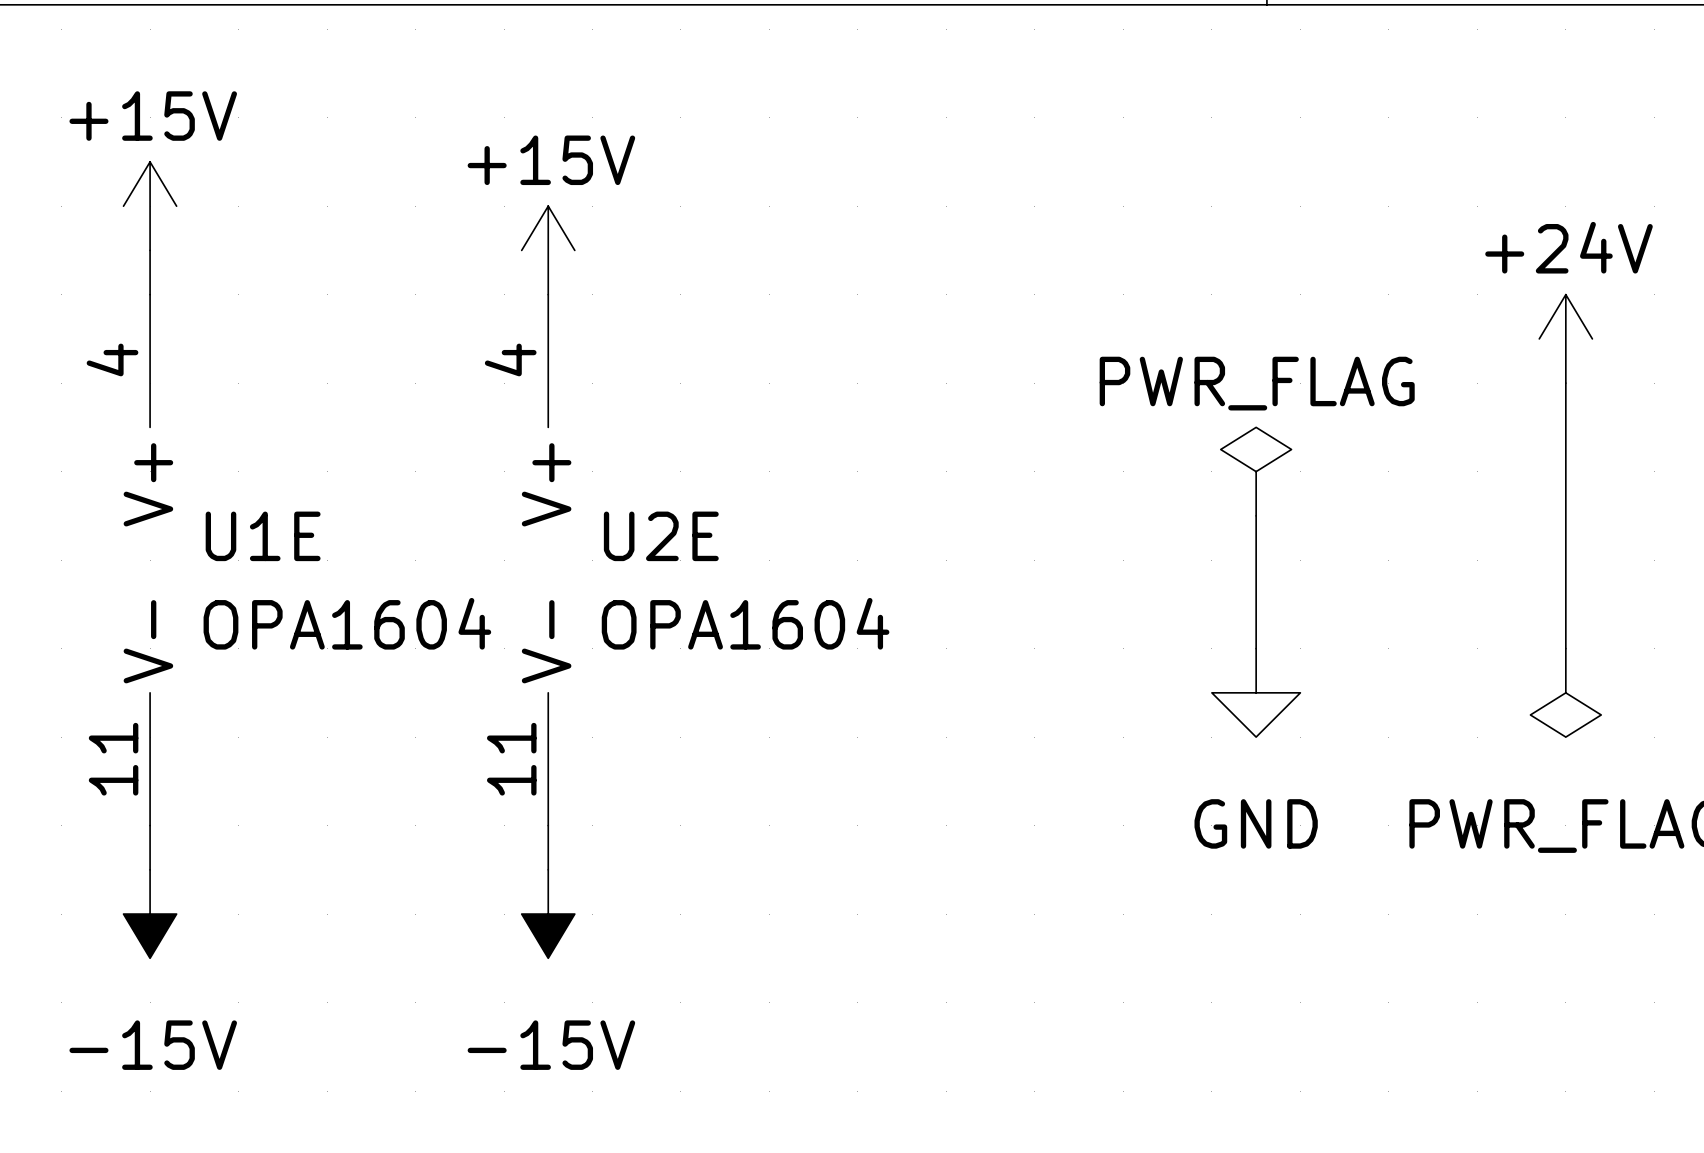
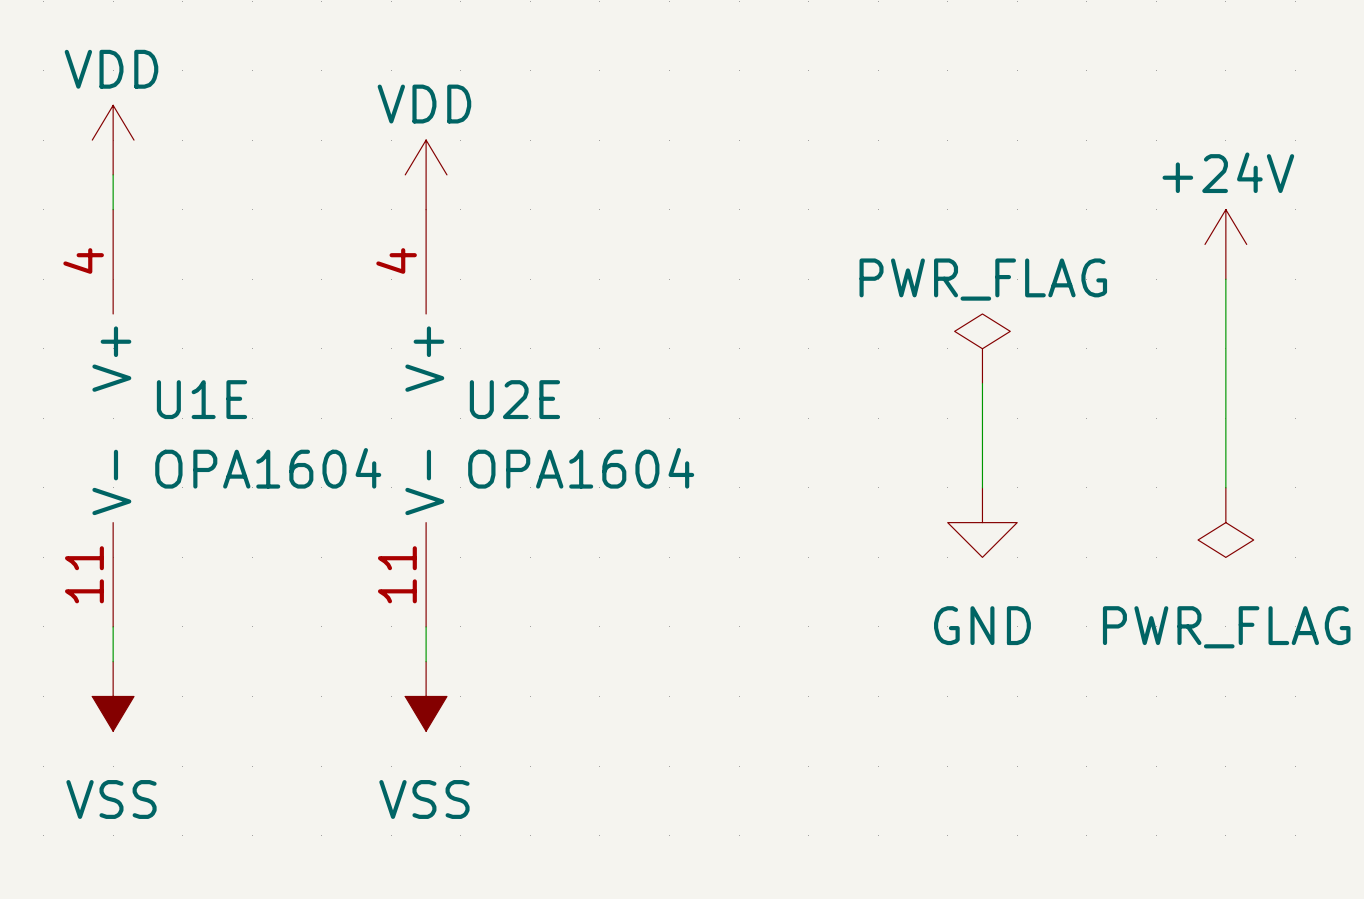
power symbol: +15V (150, 206) -> VDD (113, 140)
power symbol: +15V (548, 250) -> VDD (426, 174)
power symbol: -15V (150, 914) -> VSS (113, 696)
power symbol: -15V (548, 914) -> VSS (426, 696)

